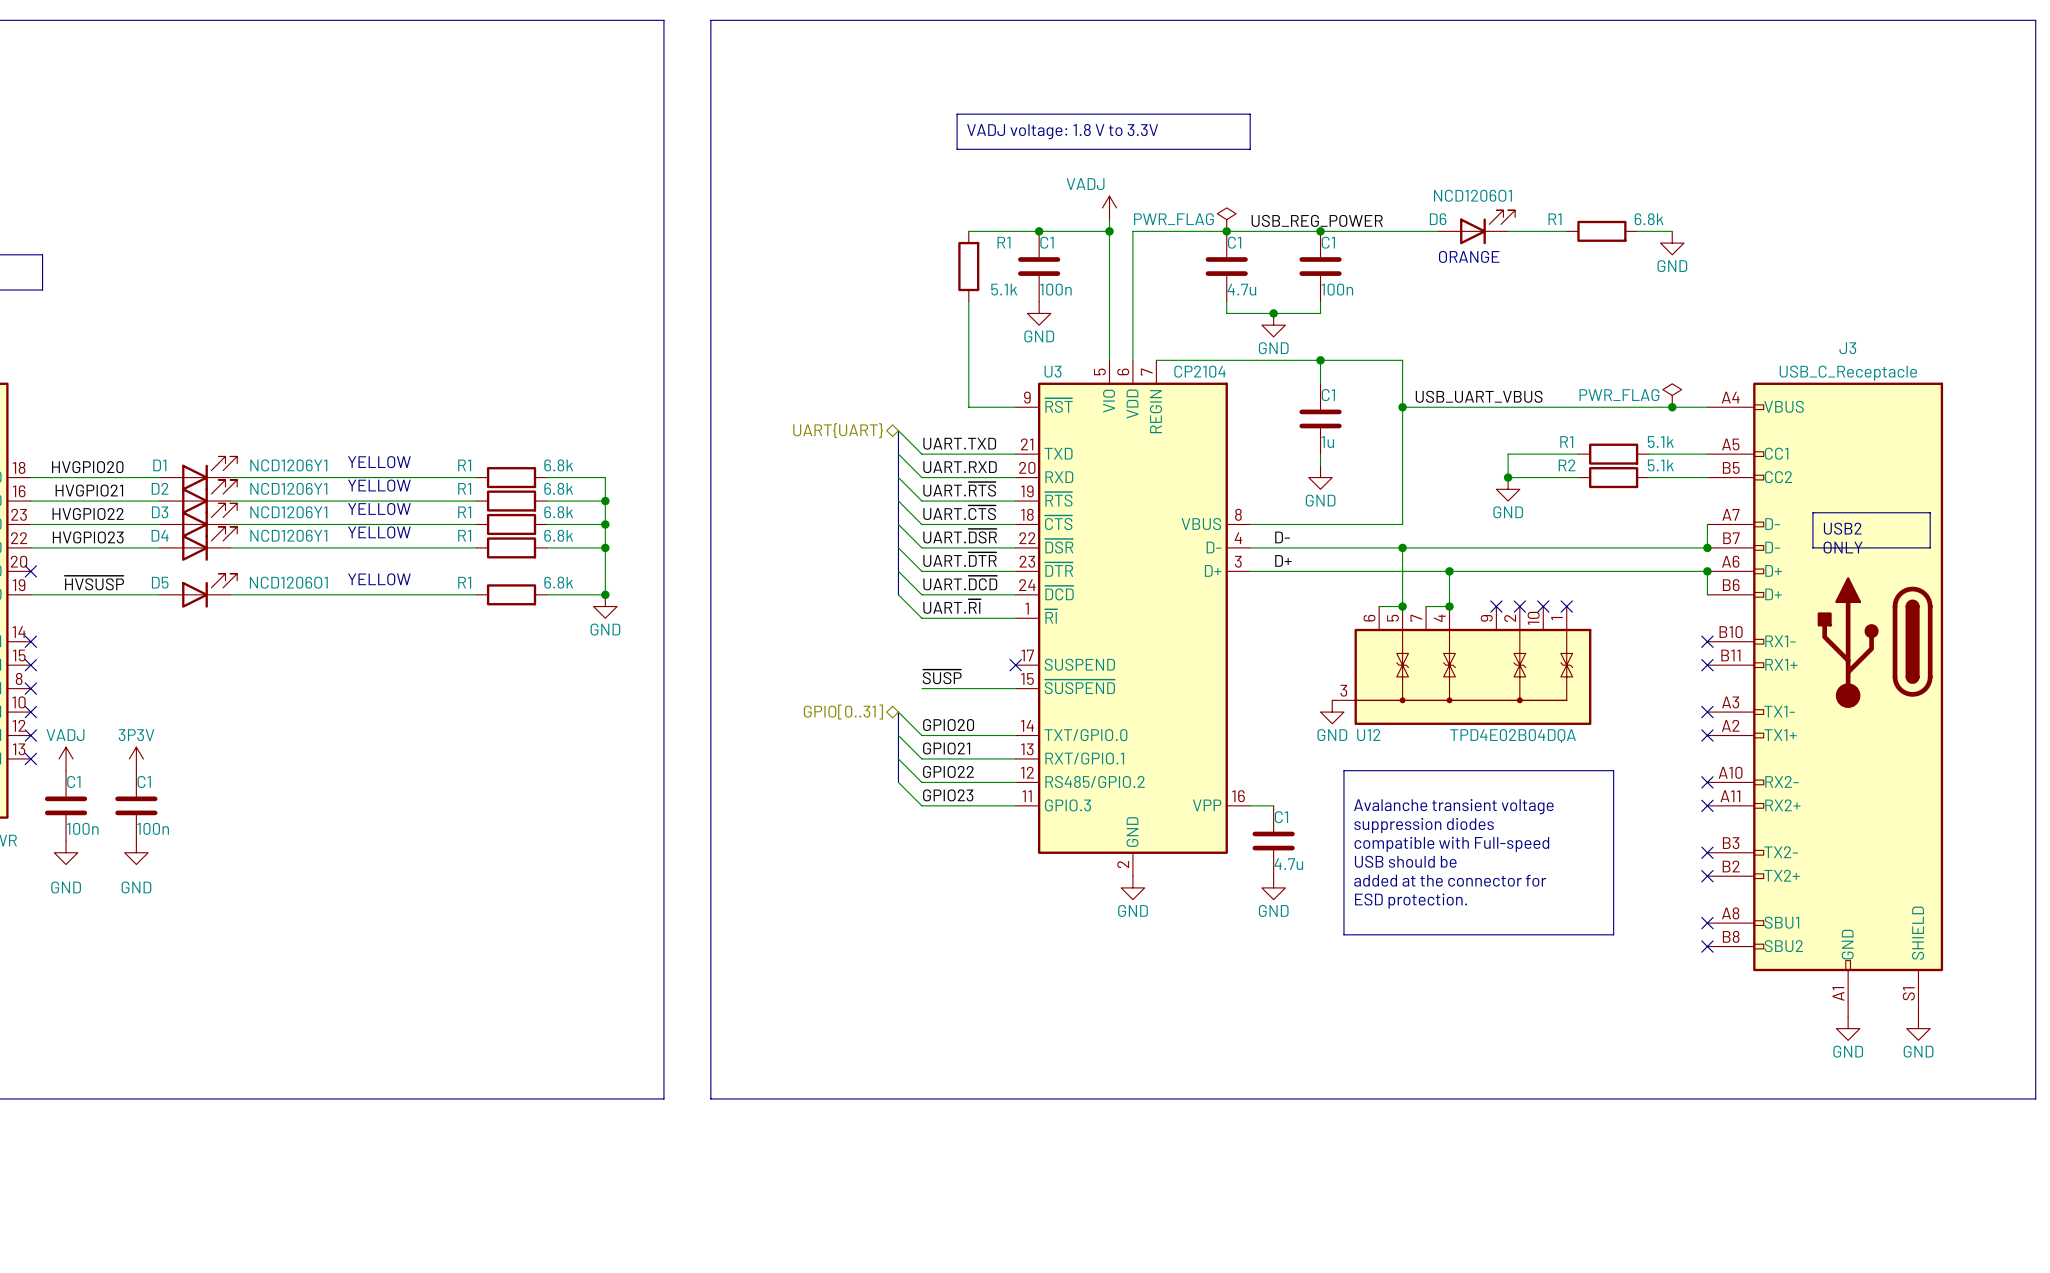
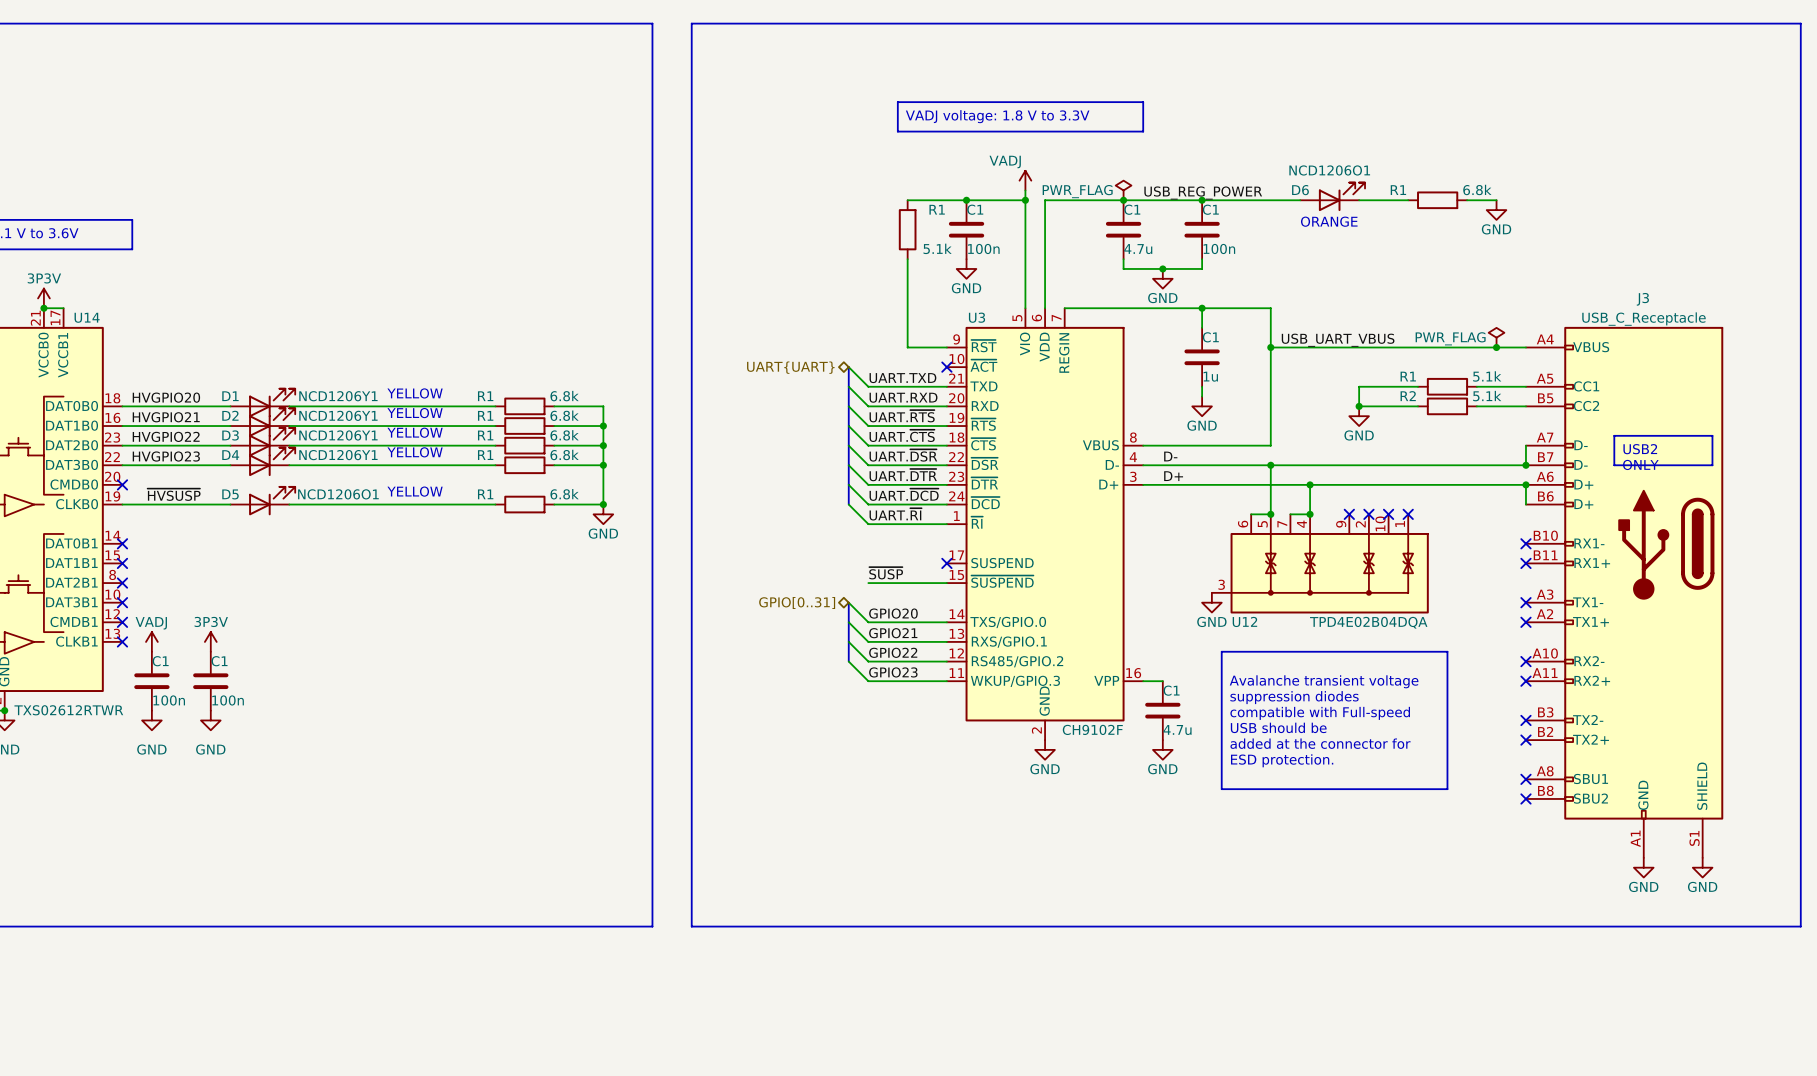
U3 symbol: [1015, 360, 1251, 877] -> [946, 308, 1144, 741]
U3 value: CP2104 (1200, 371) -> CH9102F (1092, 729)
no-connect mark: none -> (946, 367)

